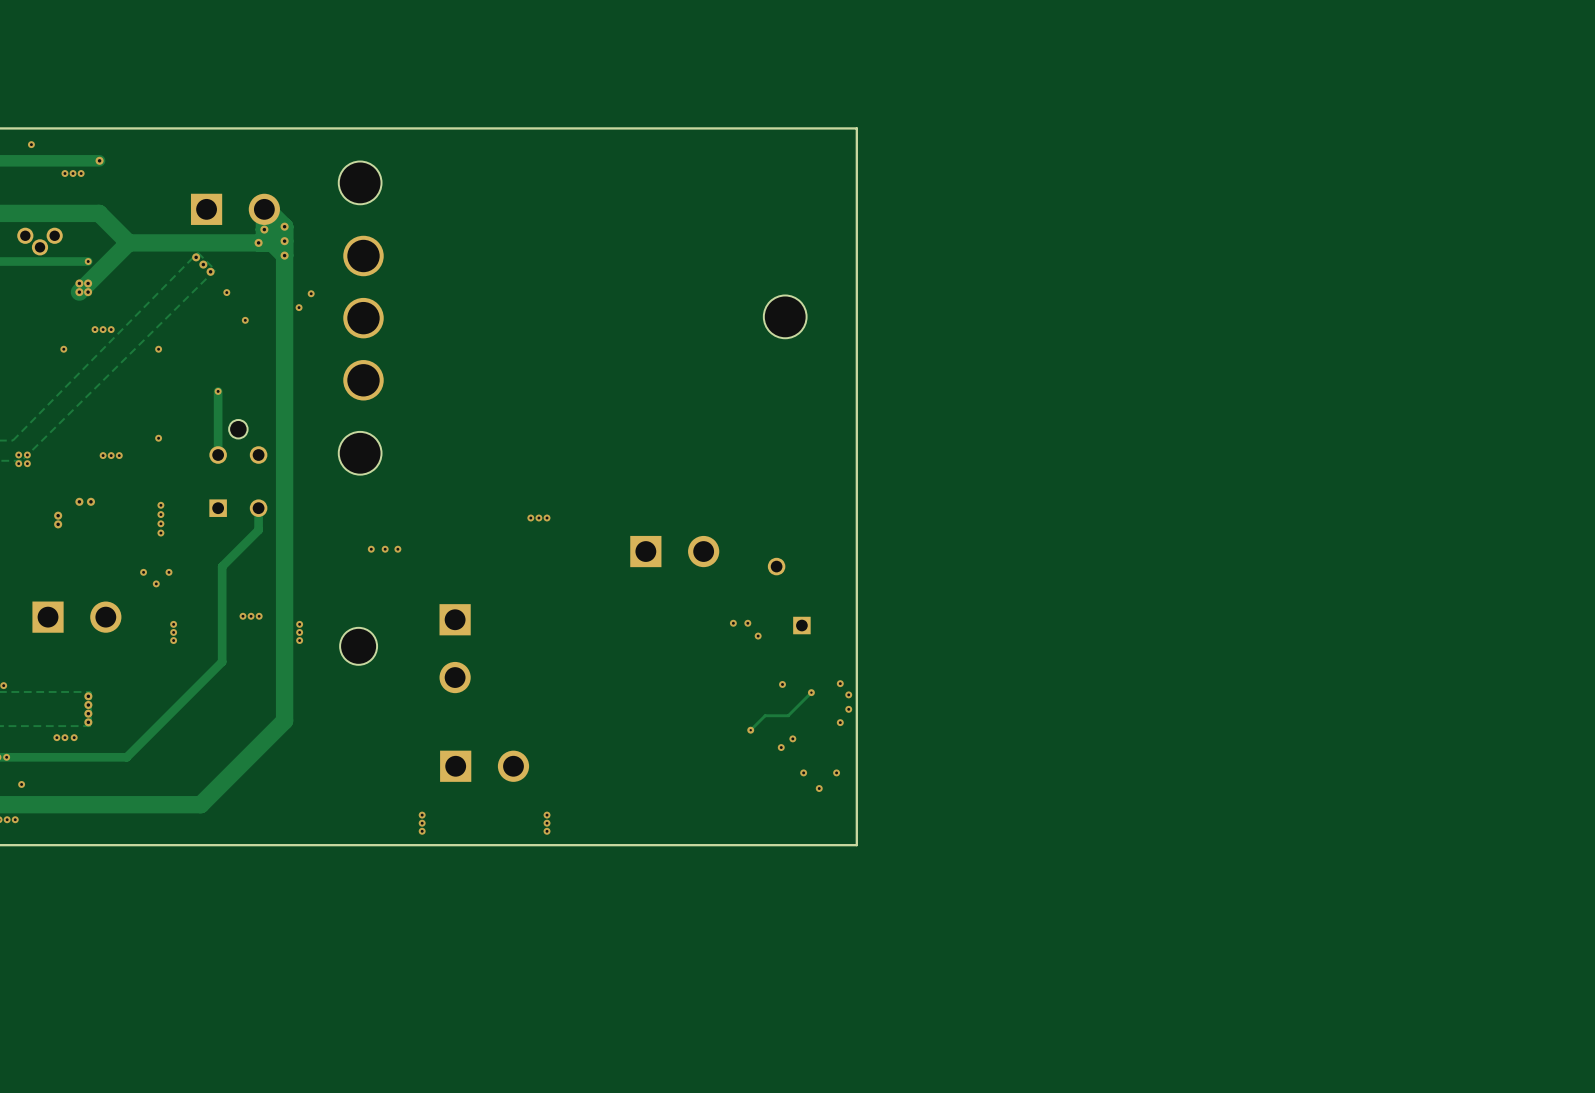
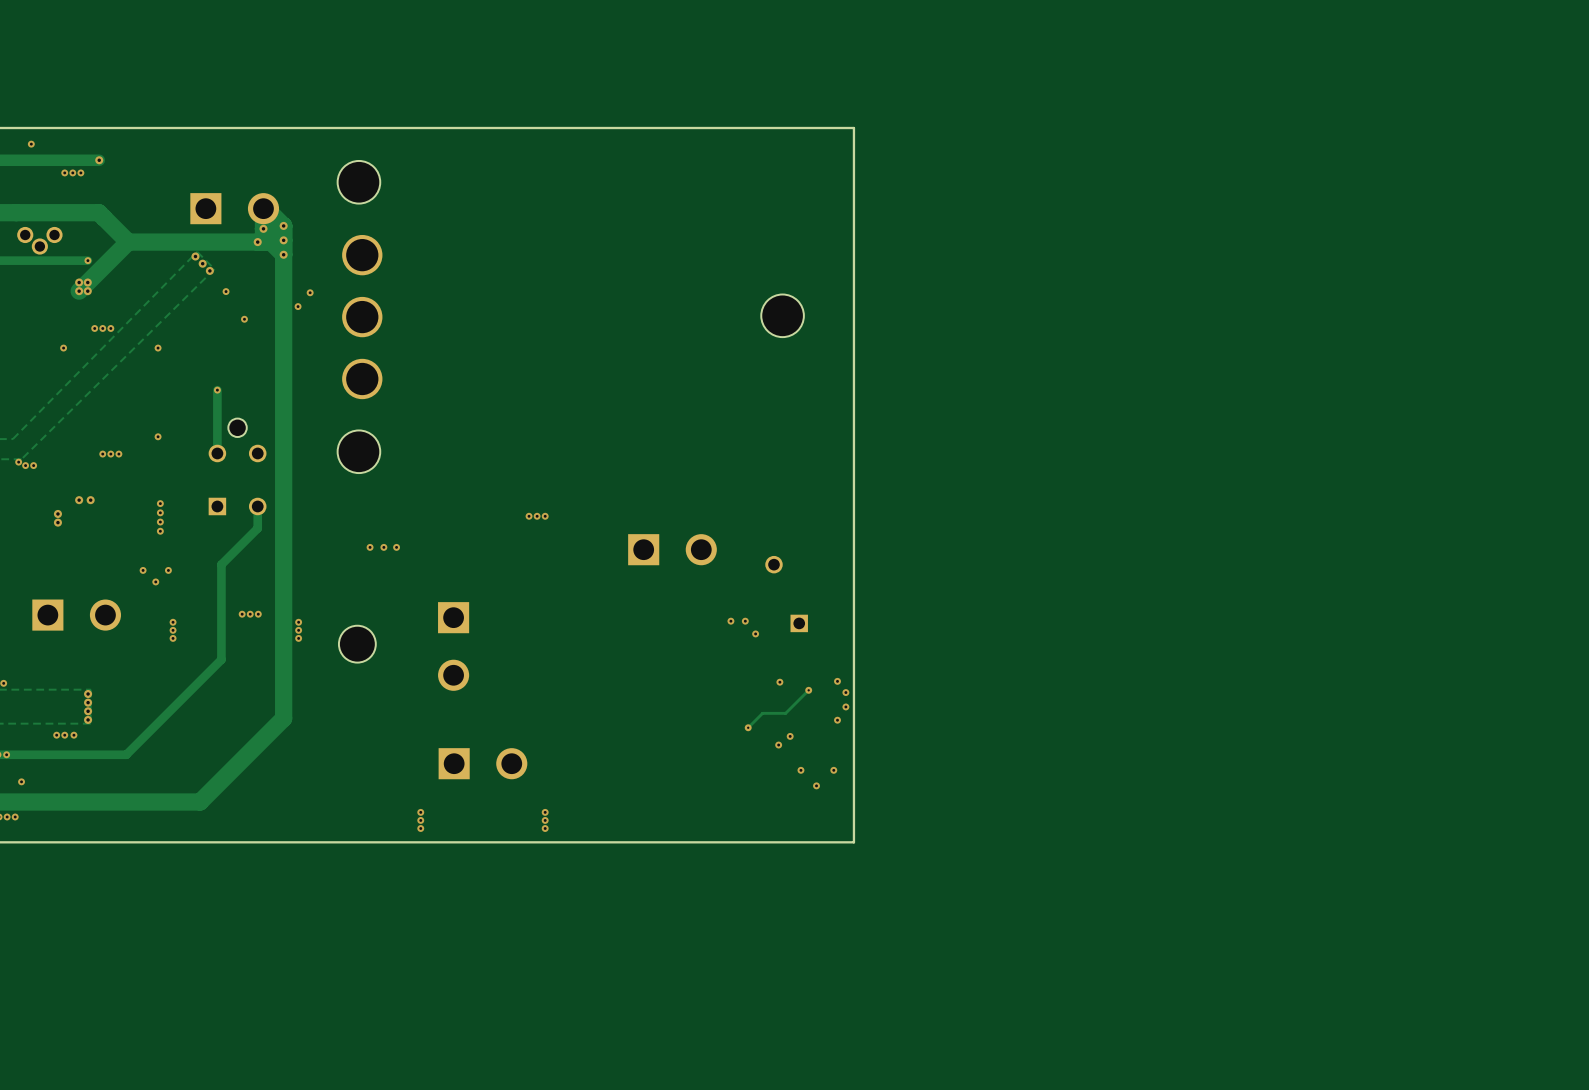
via: (18, 455) -> none
via: (27, 455) -> none
via: (27, 463) -> none
via: none -> (25, 465)
via: none -> (33, 465)

